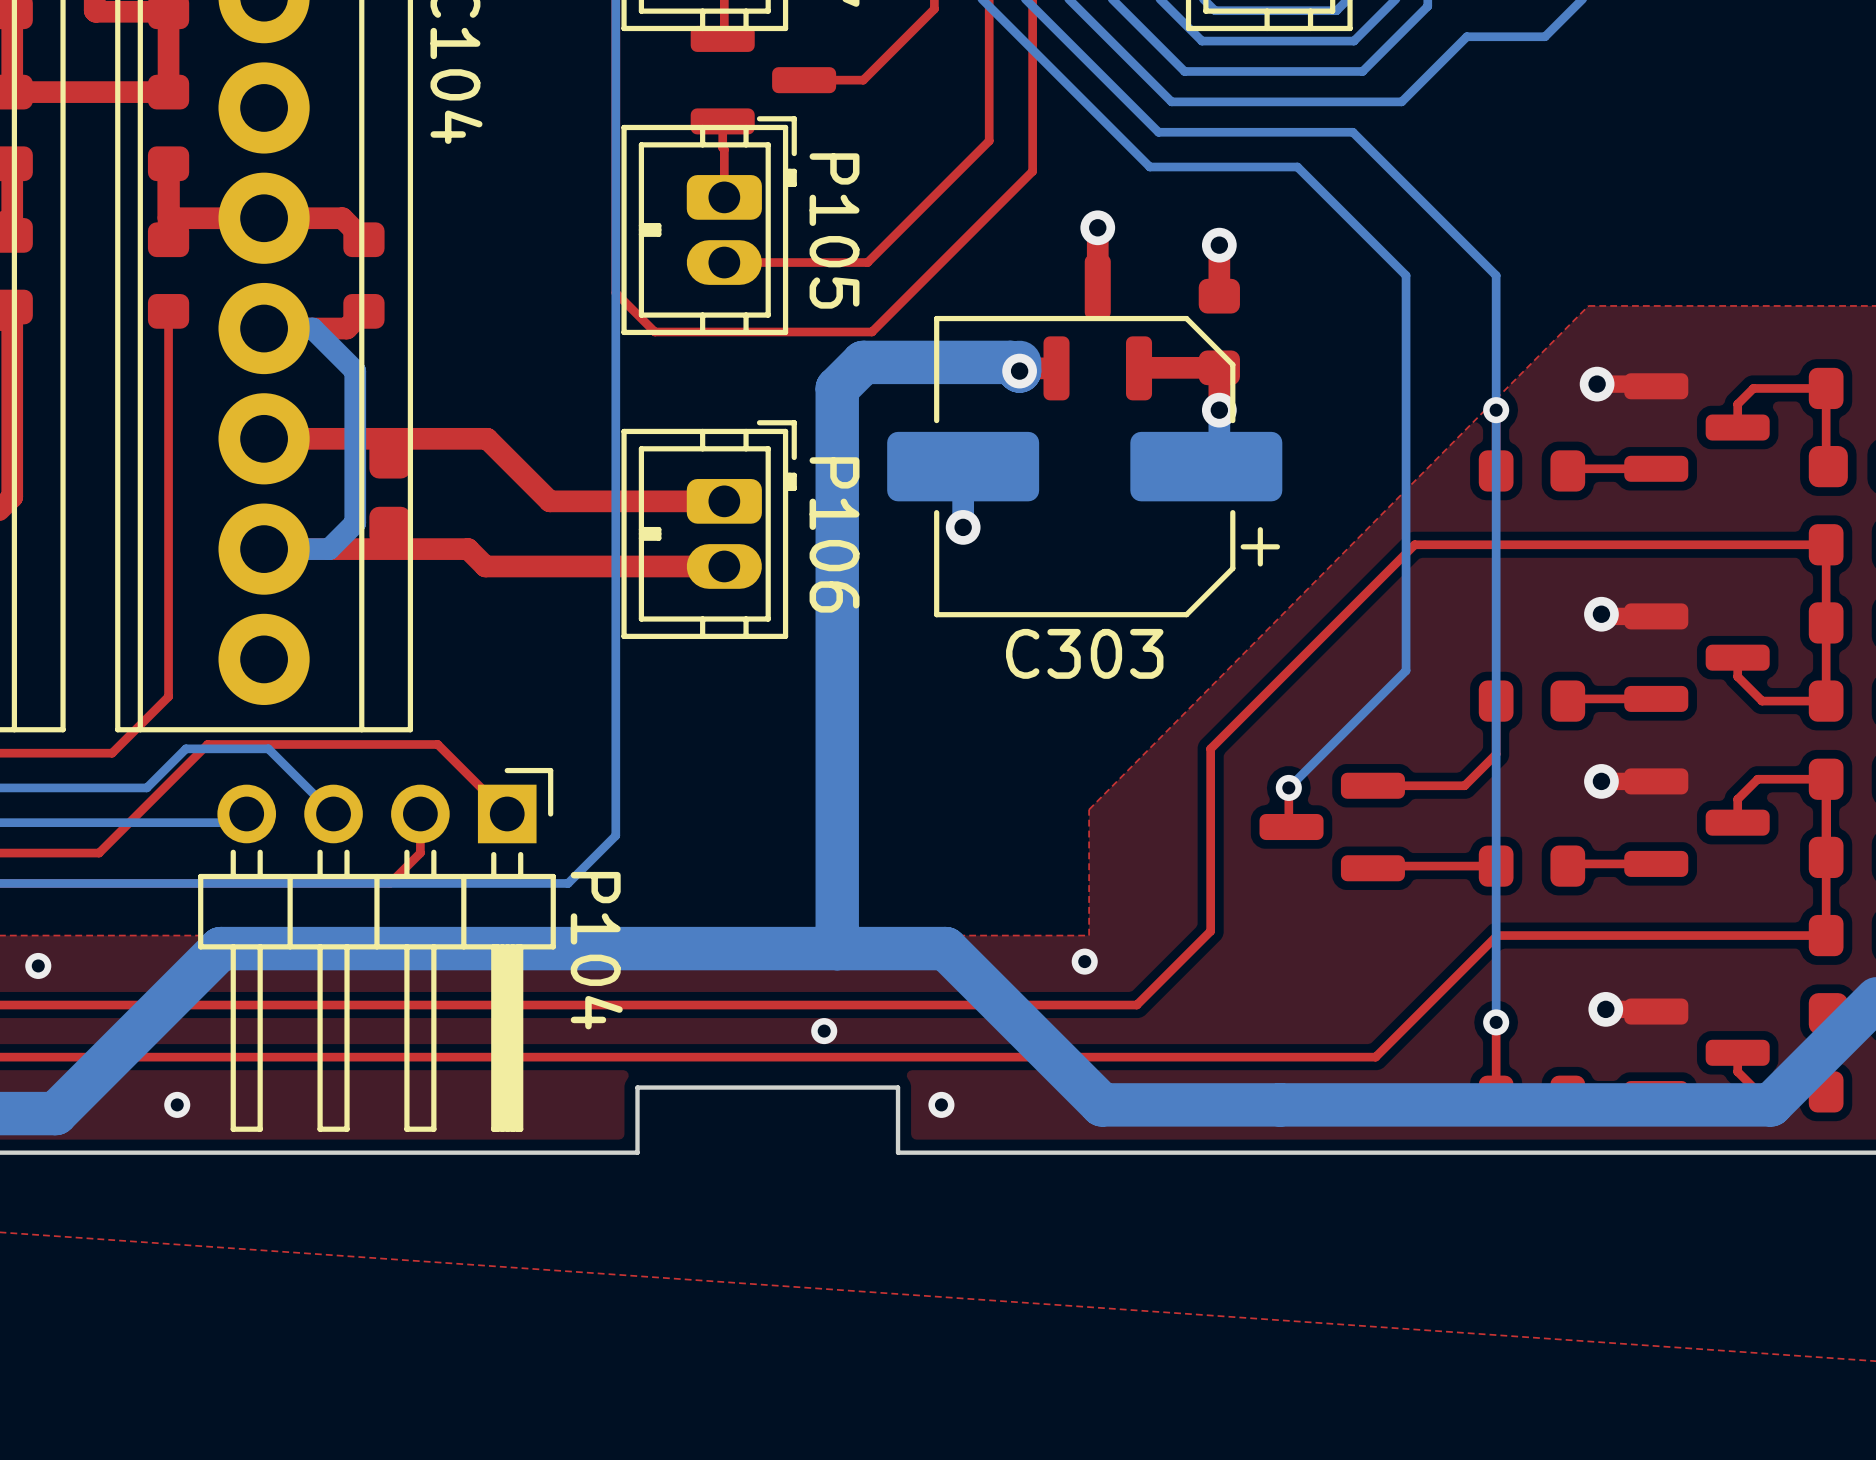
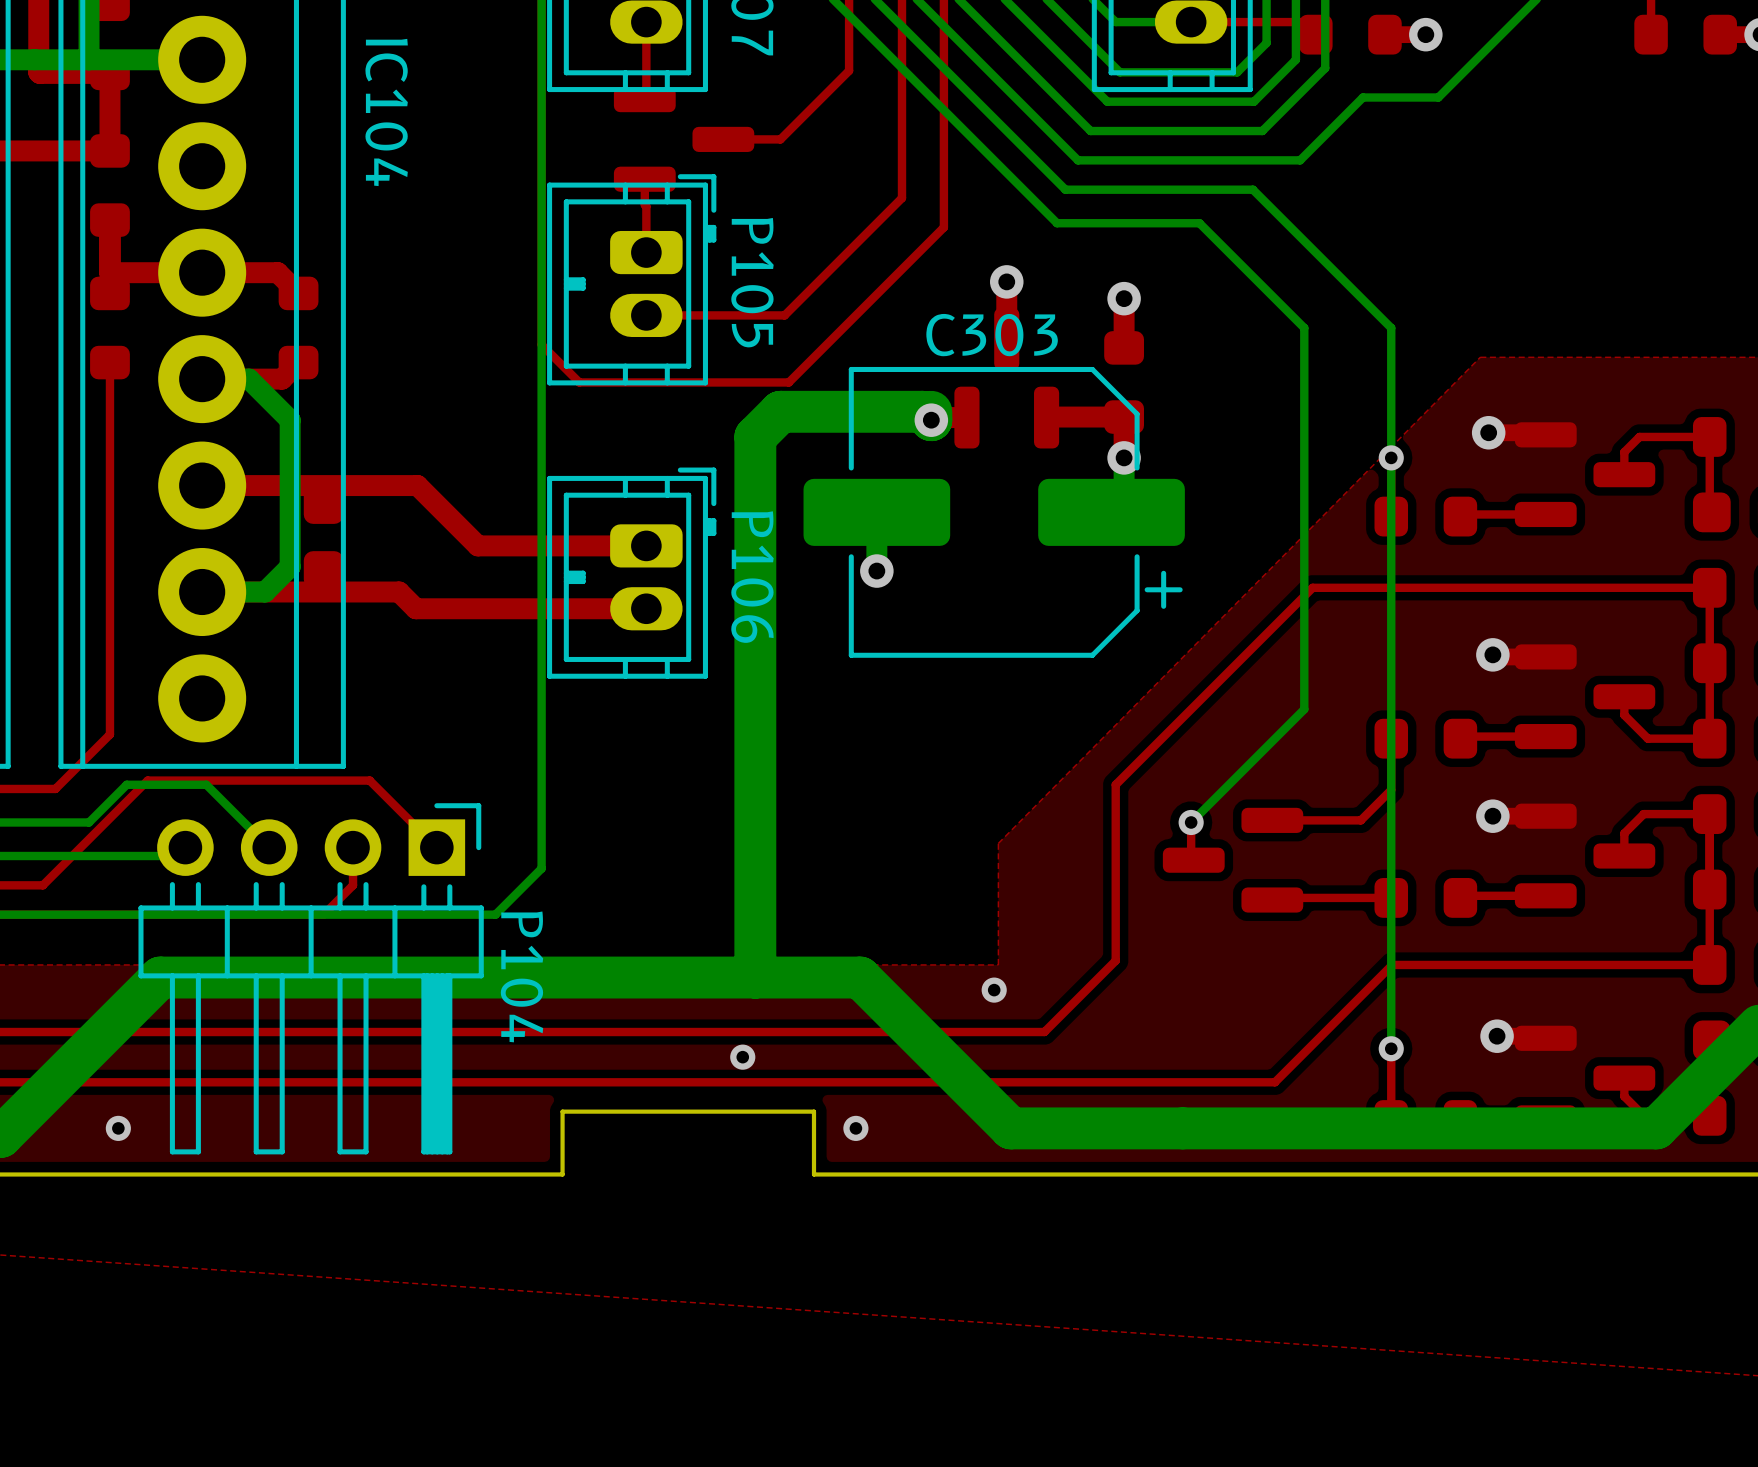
C303 name position: C303 (1084, 653) -> C303 (992, 335)

